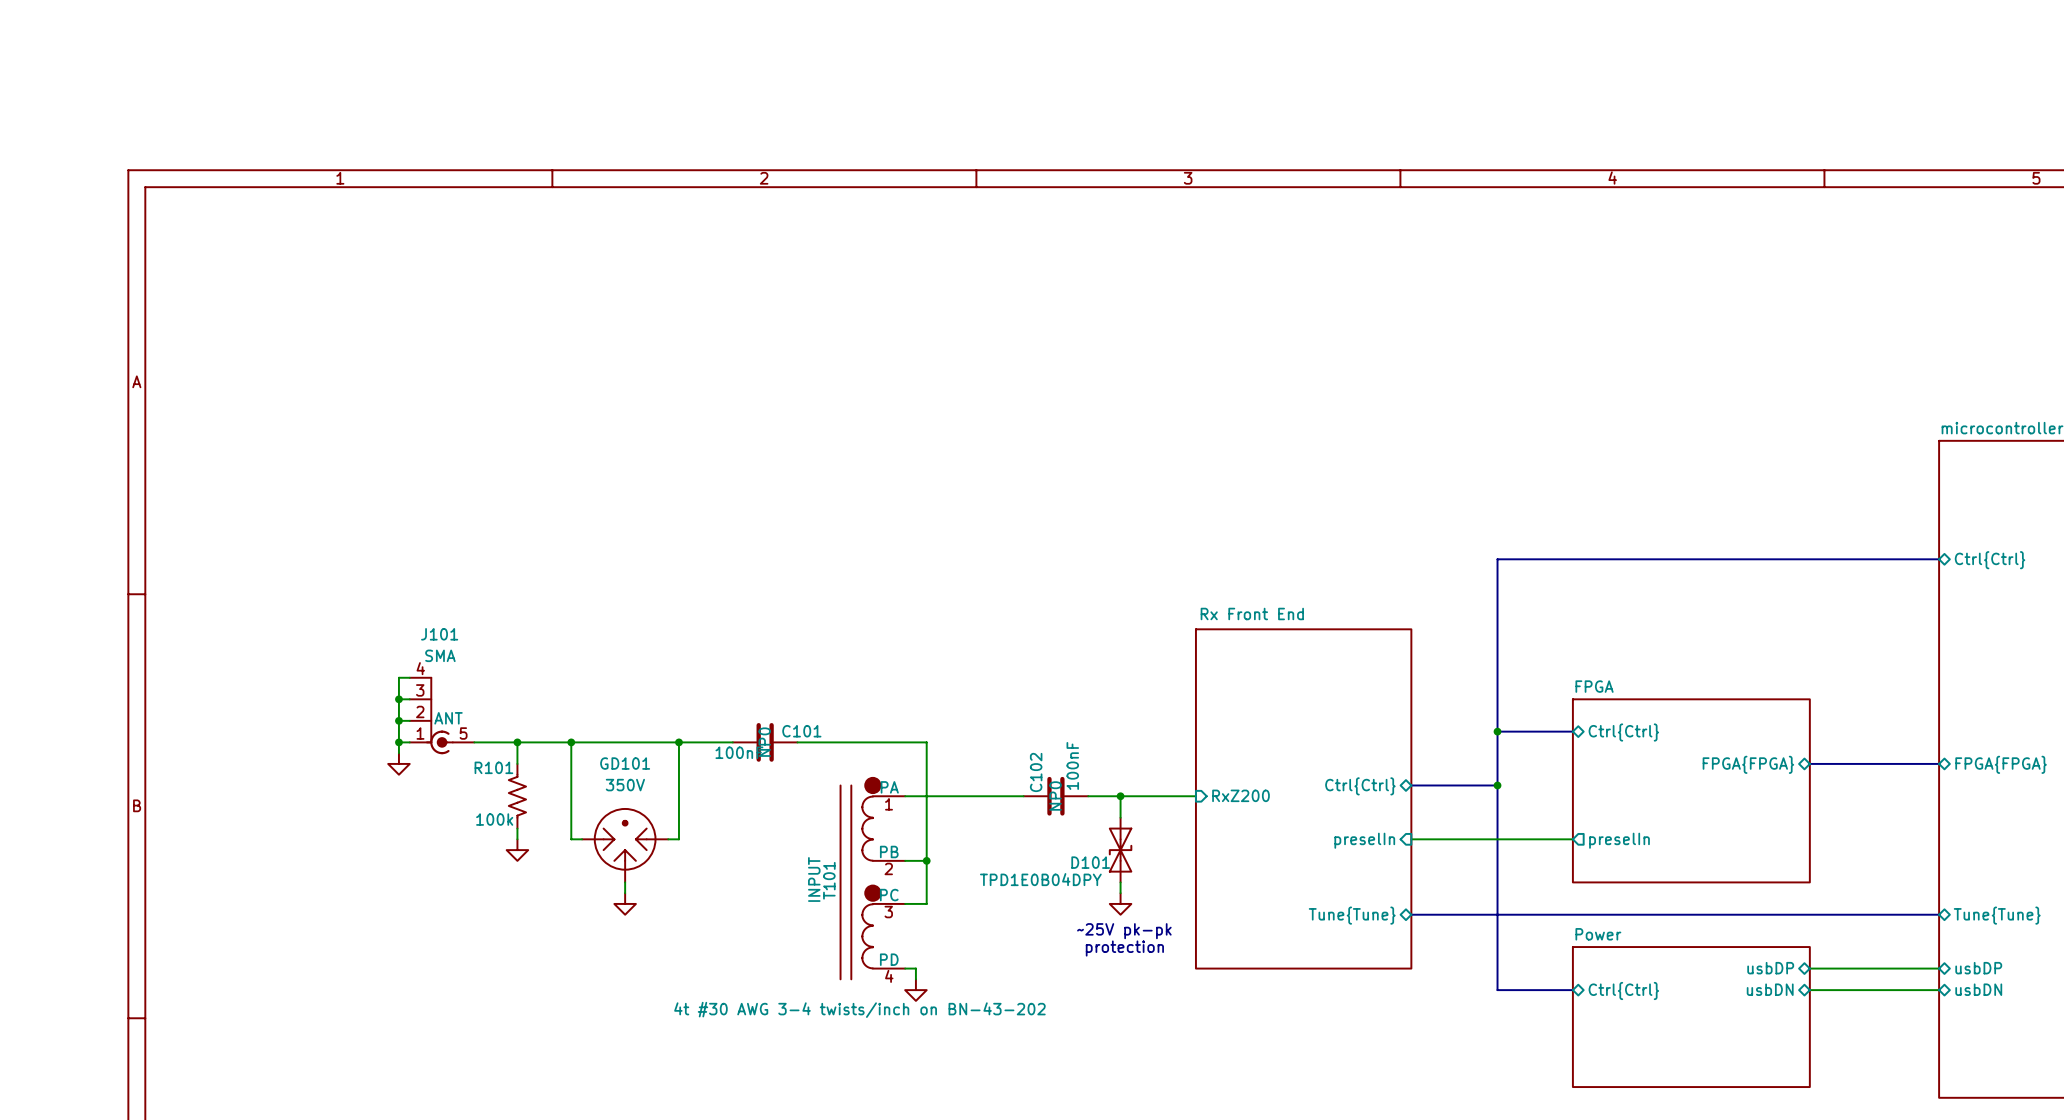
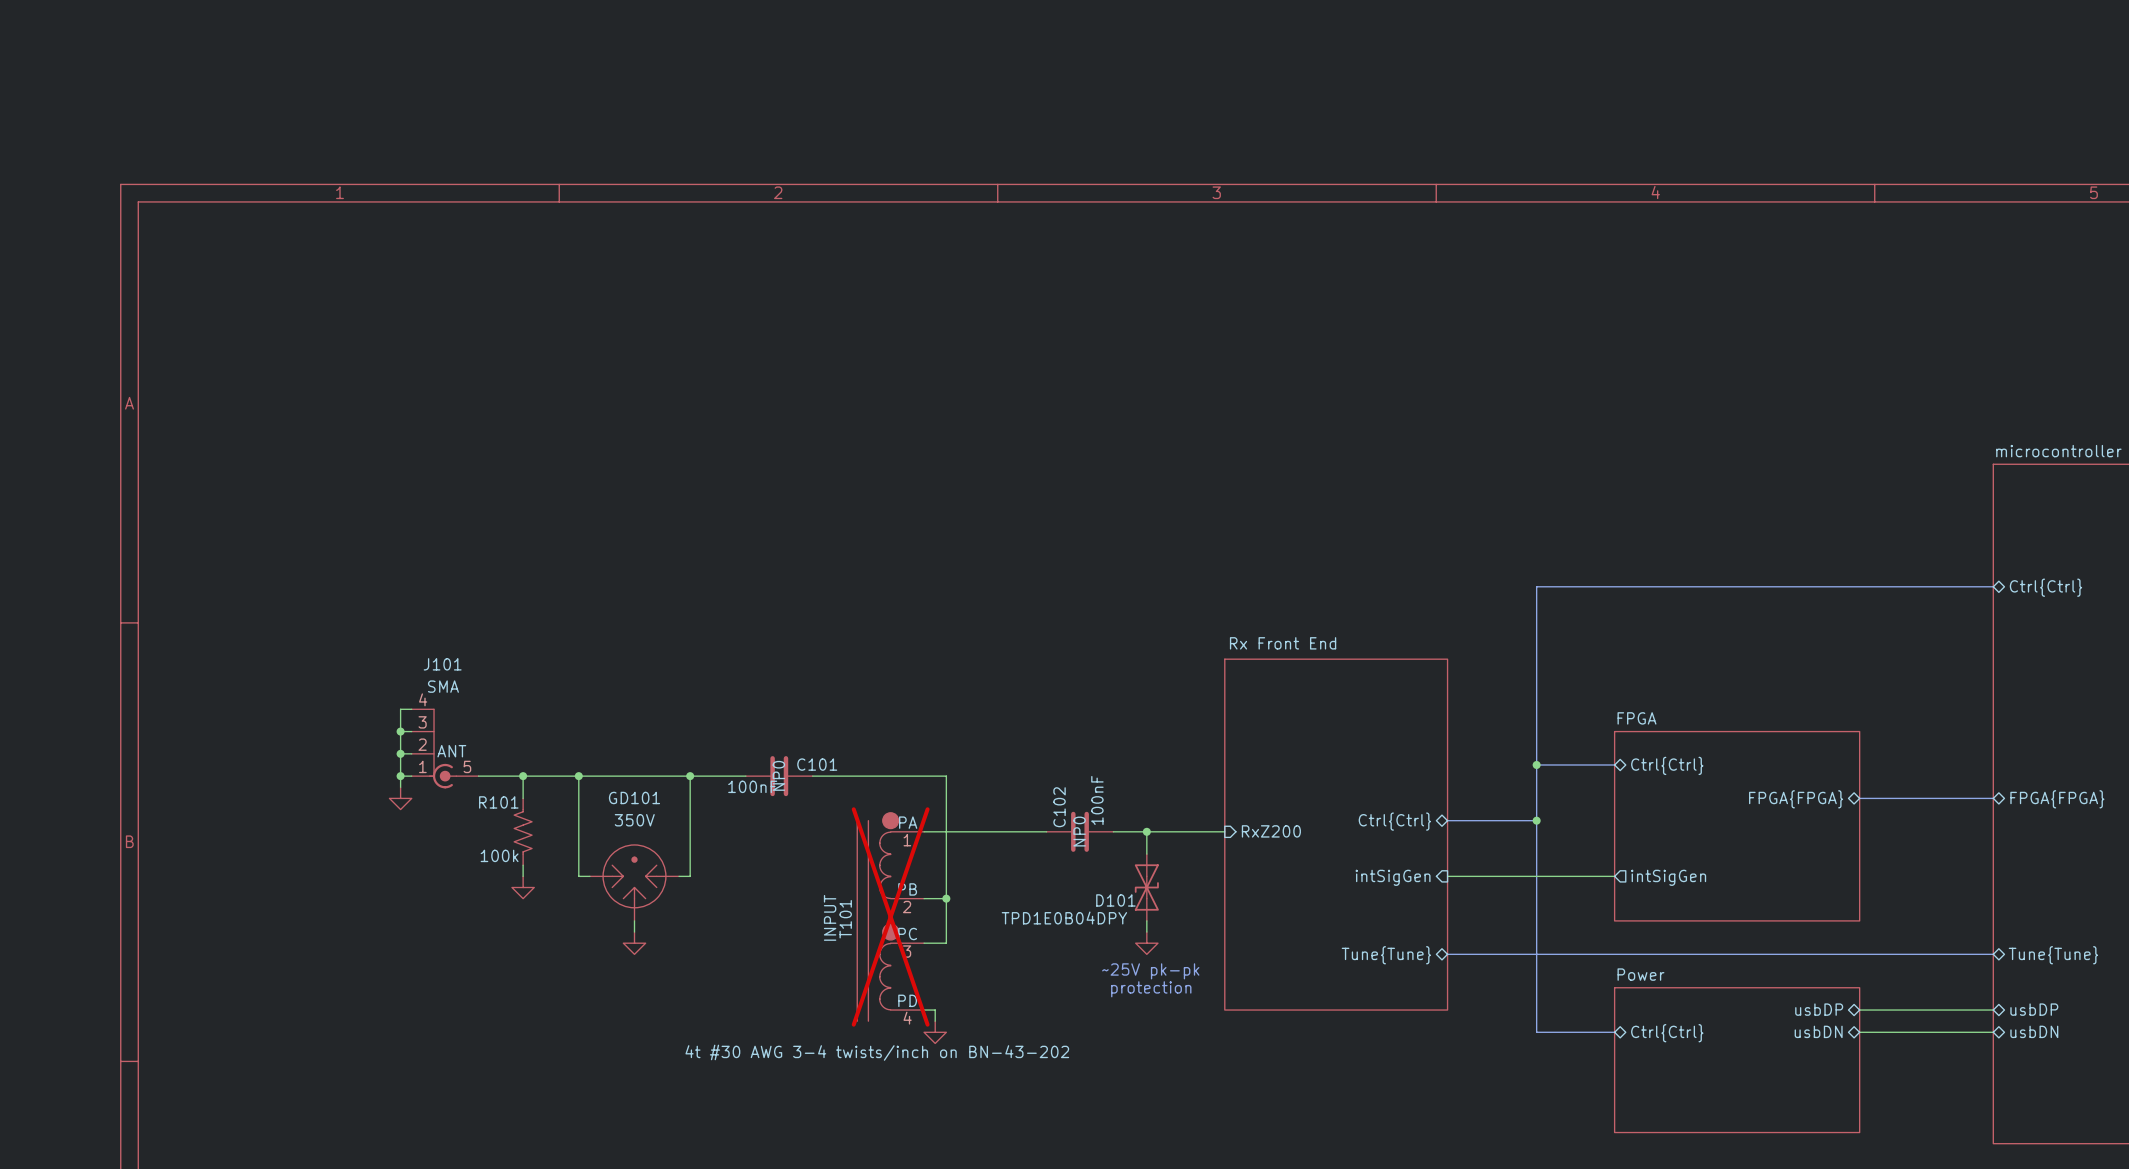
sheet pin: preselIn (1364, 840) -> intSigGen (1393, 877)
sheet pin: preselIn (1619, 840) -> intSigGen (1668, 877)
T101 do-not-place cross: none -> (890, 916)

